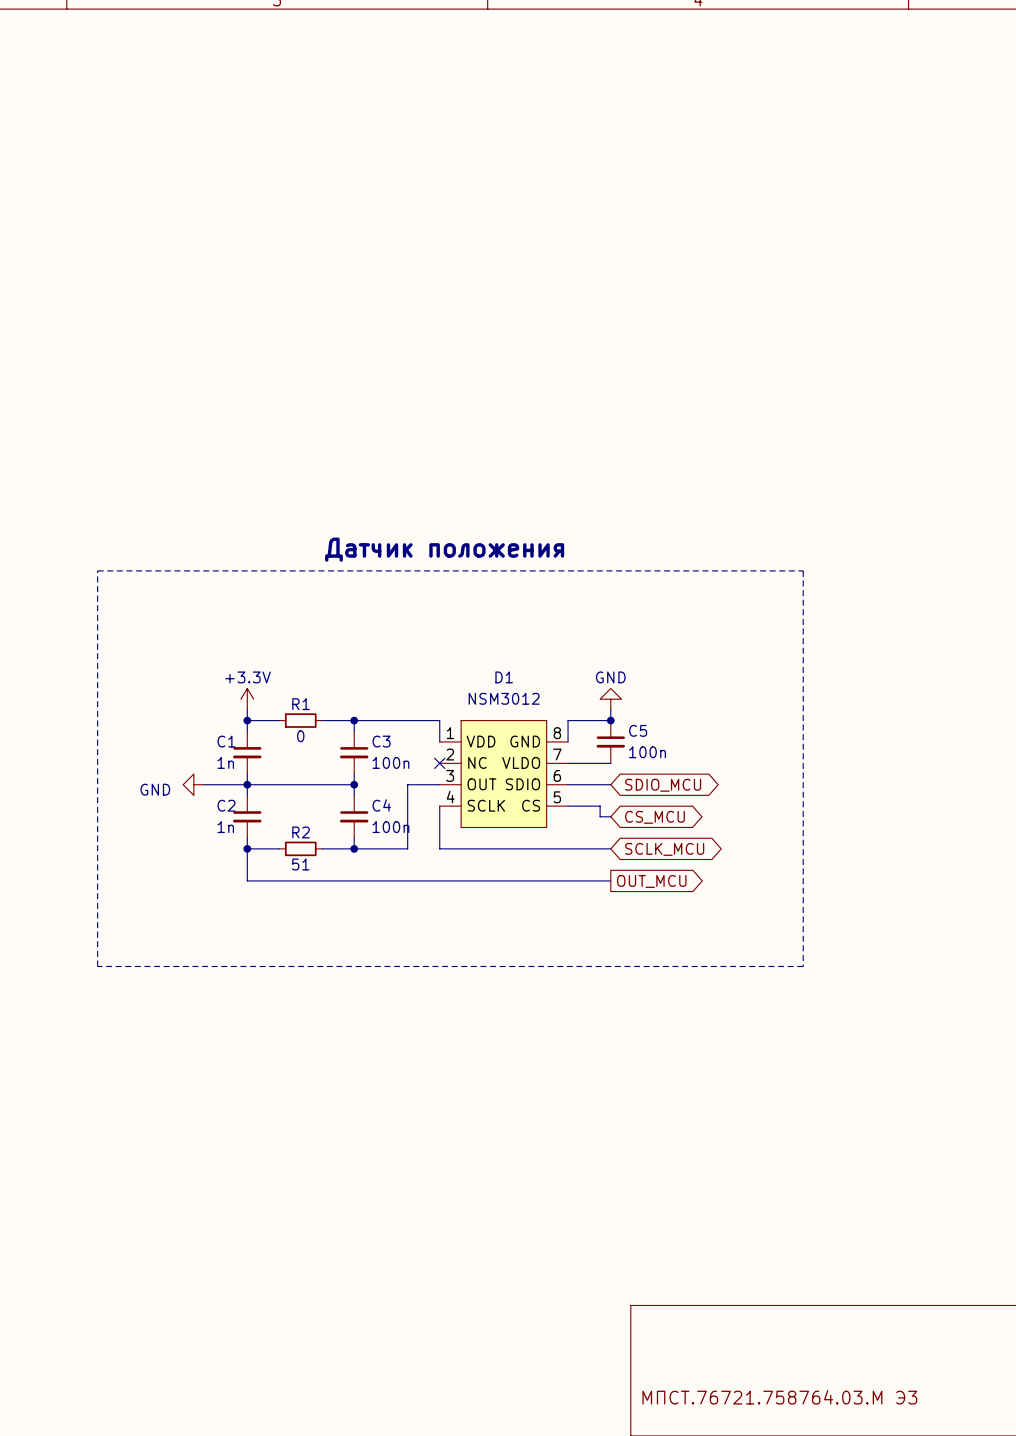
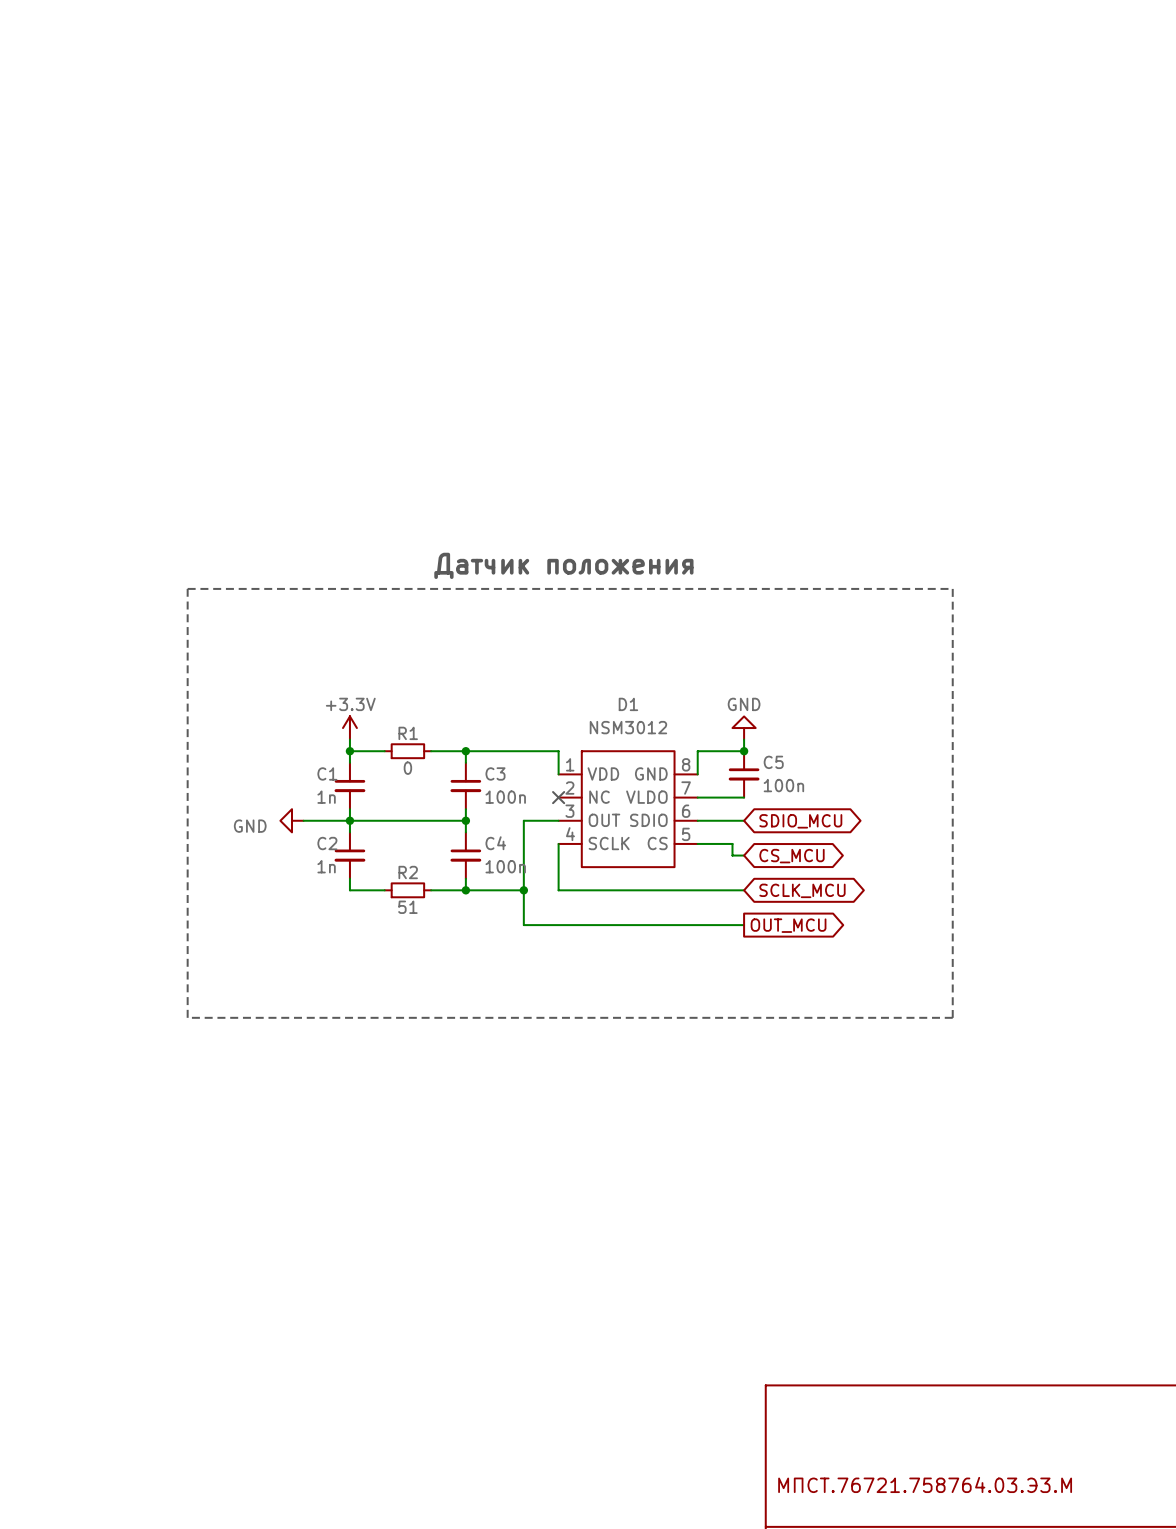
wire: (247, 848) (247, 880) (407, 880) -> (523, 890) (523, 925)
junction: (247, 848) -> none
junction: none -> (523, 890)
title block: МПСТ.76721.758764.03.М Э3 (779, 1397) -> МПСТ.76721.758764.03.Э3.М (925, 1484)

